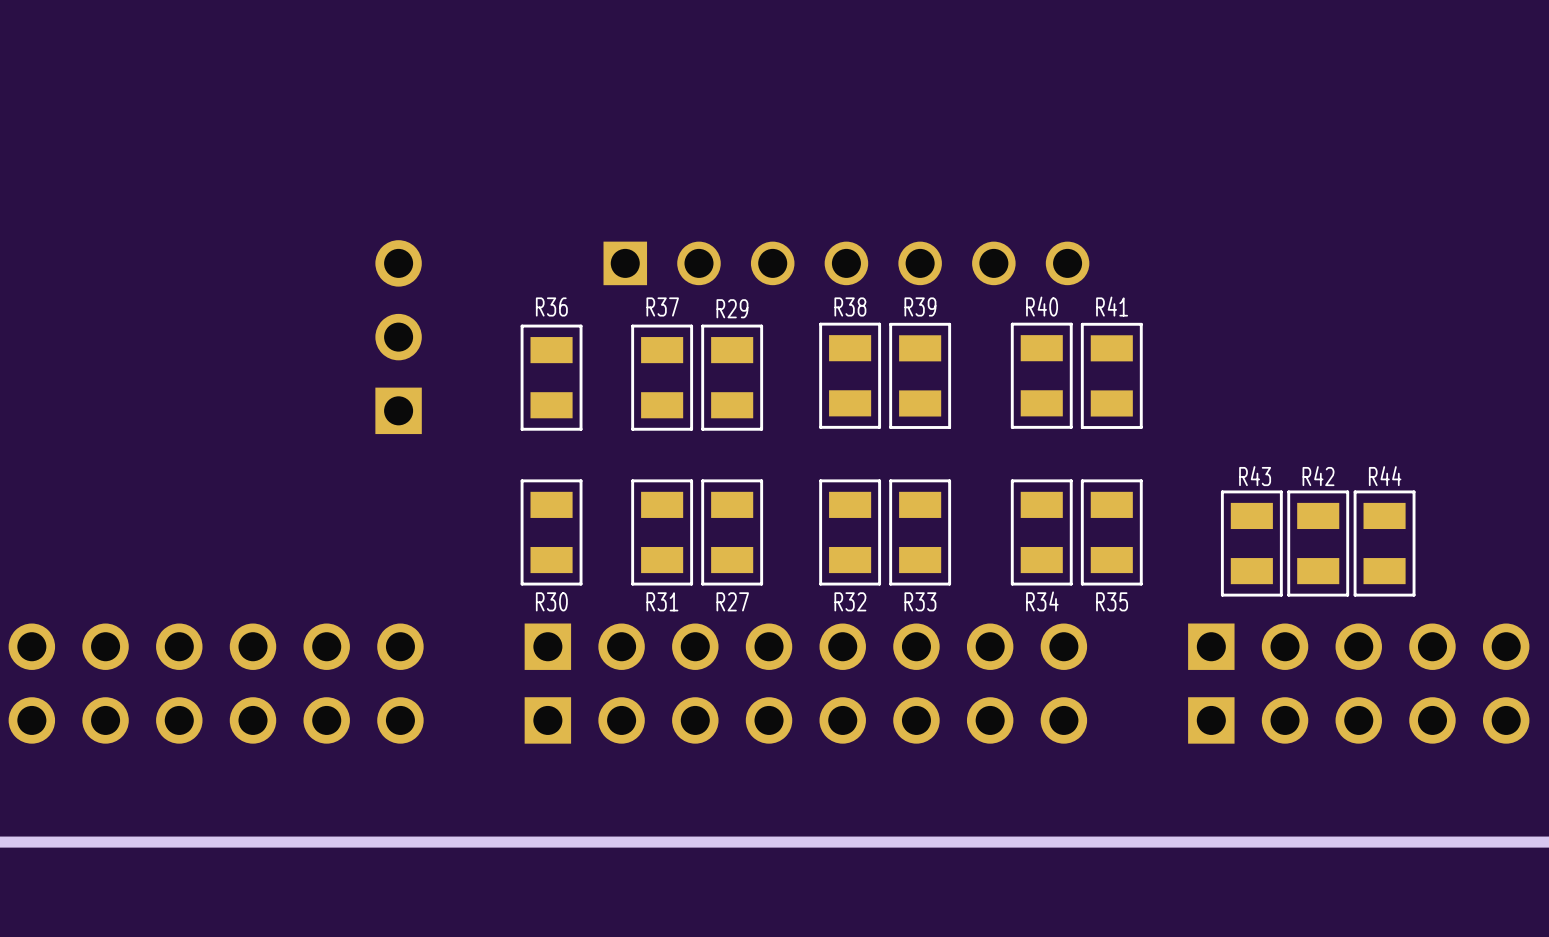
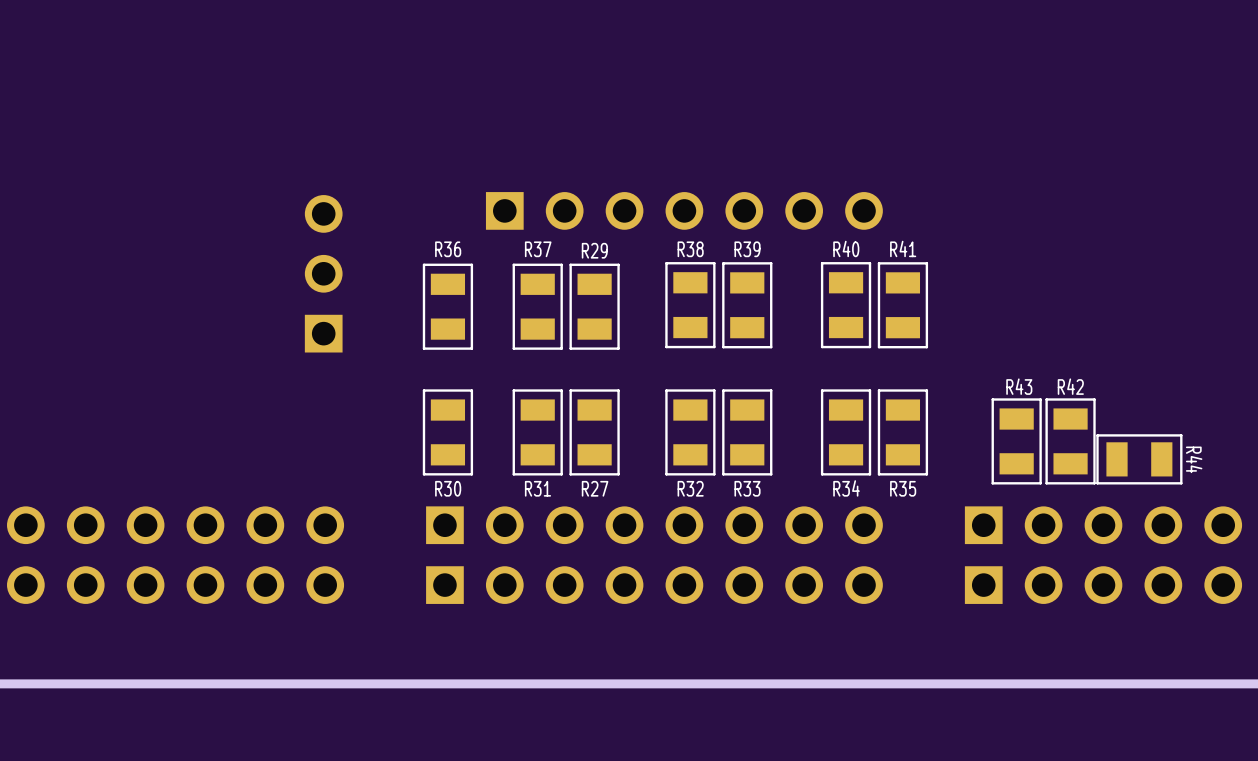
part footprint: [603, 241, 1090, 286] -> [485, 192, 883, 230]
R44 rotation: 0° (1384, 543) -> 90° clockwise (1139, 459)

